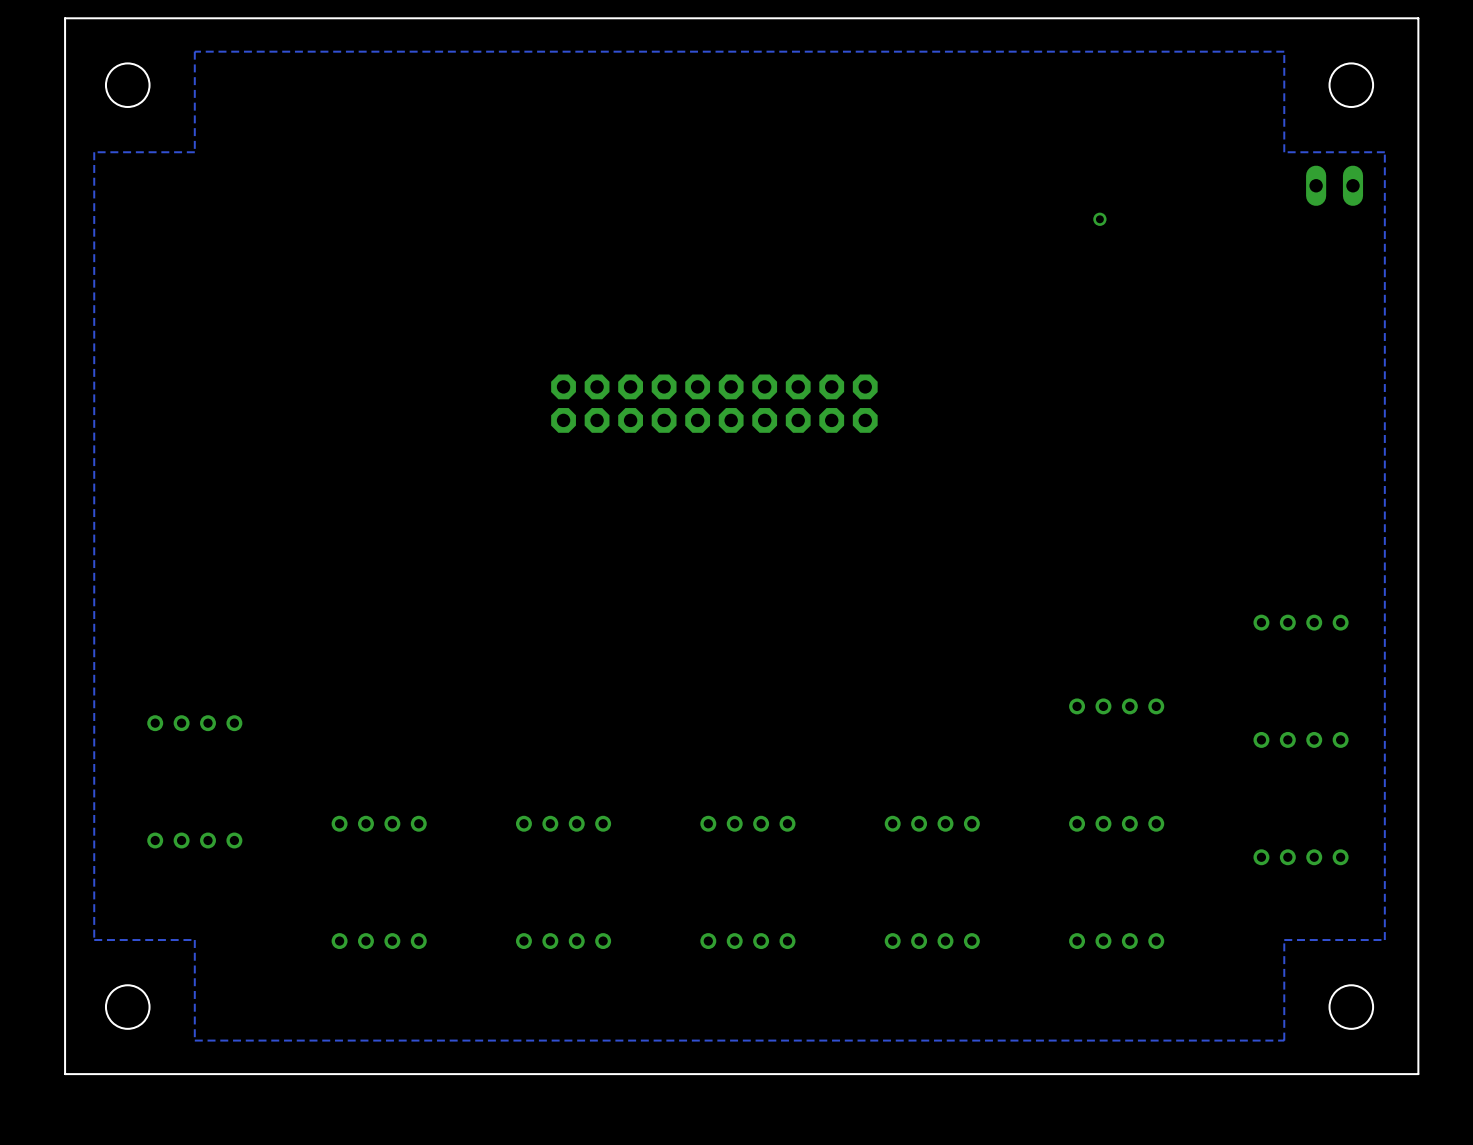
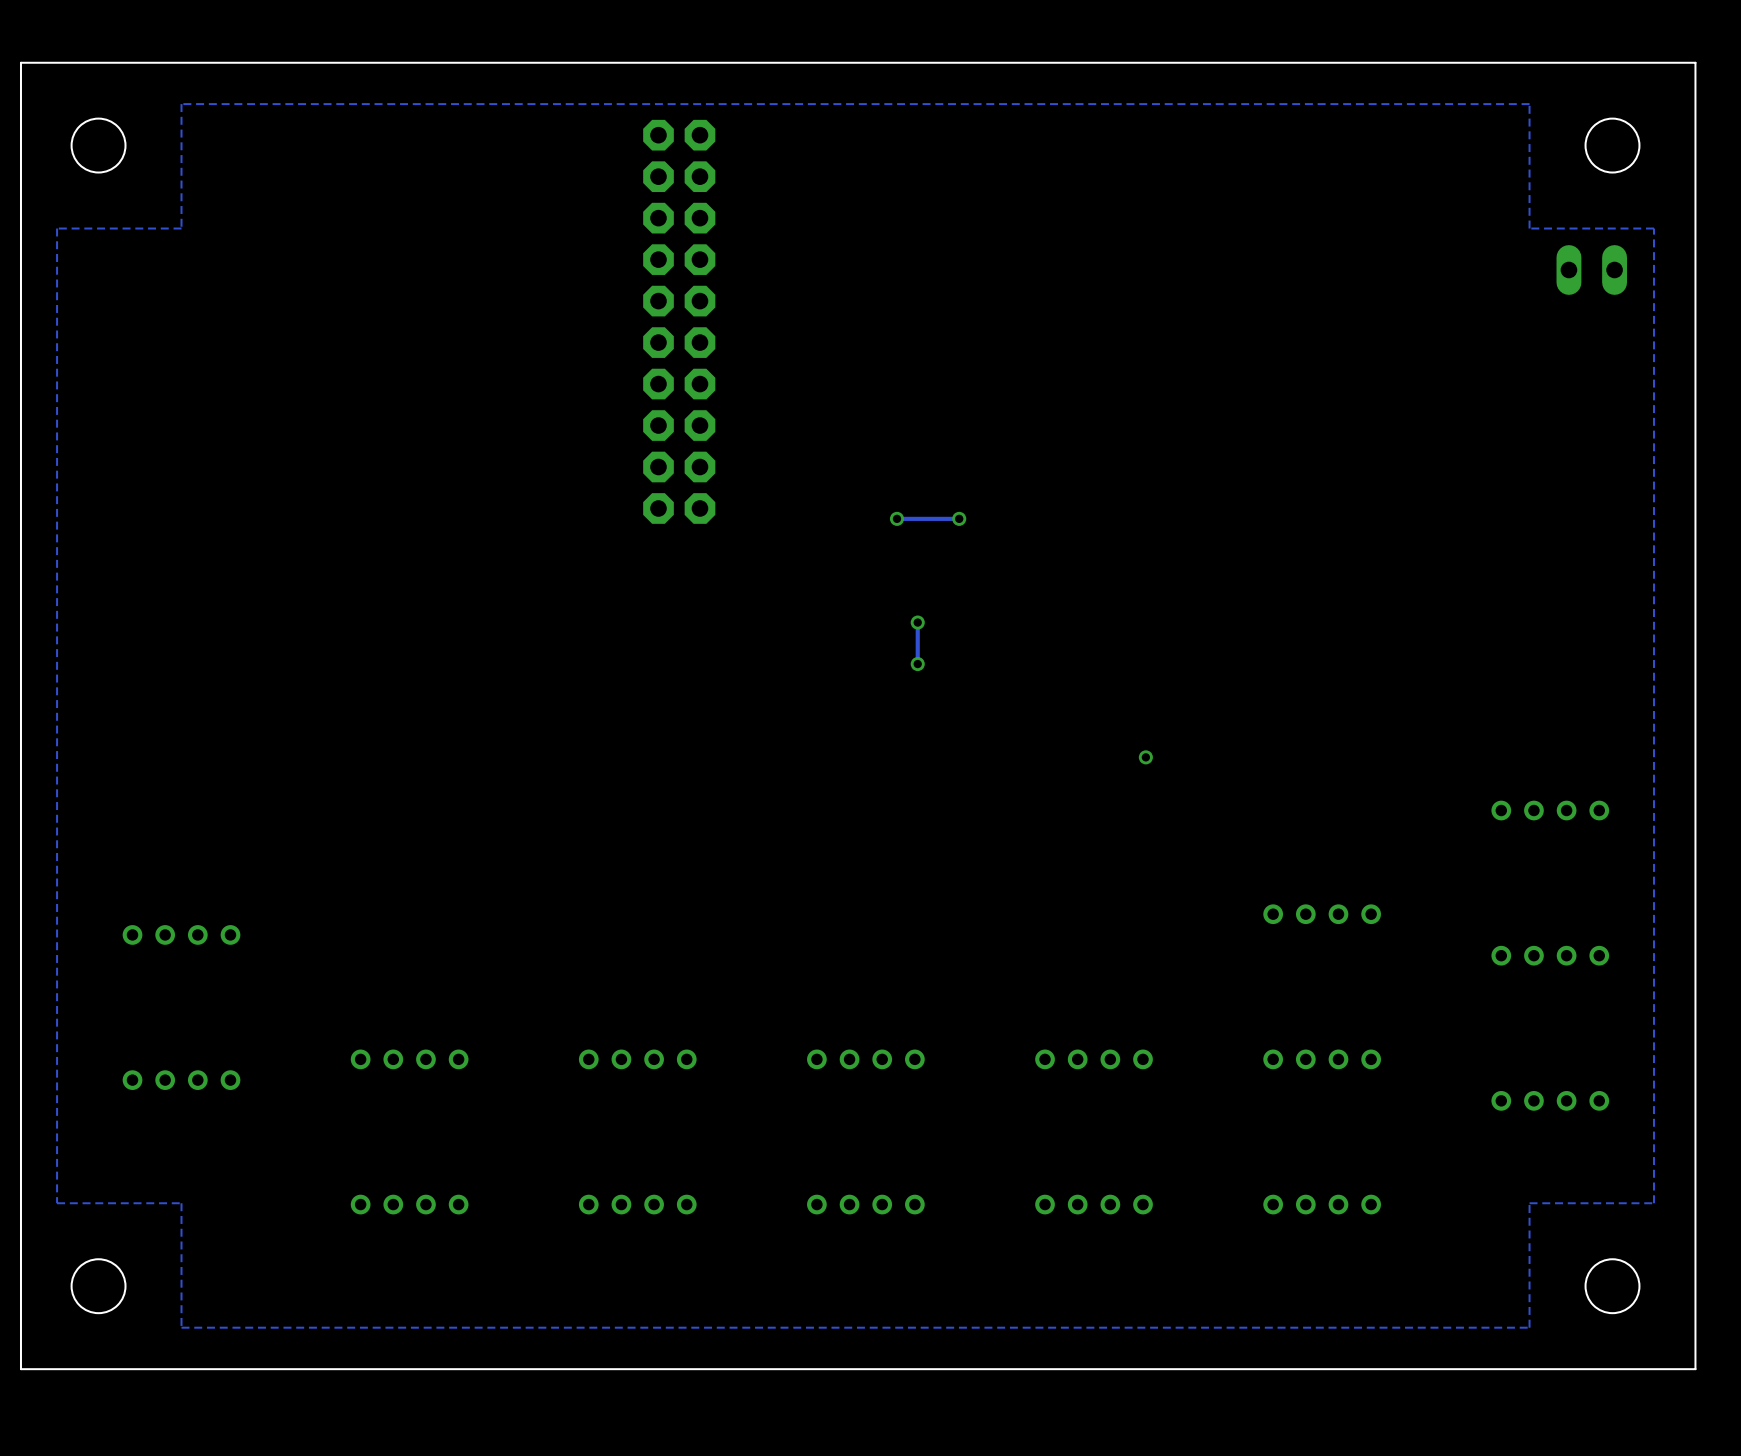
via: (1099, 219) -> none
via: none -> (897, 518)
track: none -> (959, 518) (897, 518)
via: none -> (959, 518)
part rotation: 0° (714, 403) -> 90° clockwise (679, 321)
part position: (714, 403) -> (679, 321)
track: none -> (917, 622) (917, 664)
via: none -> (917, 622)
via: none -> (917, 664)
via: none -> (1145, 757)

